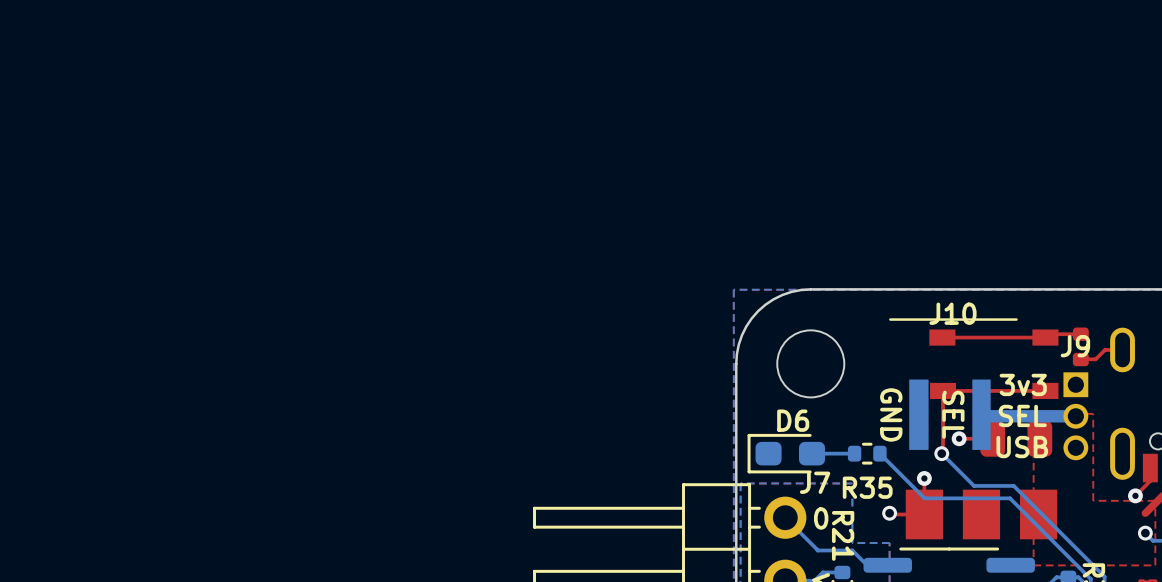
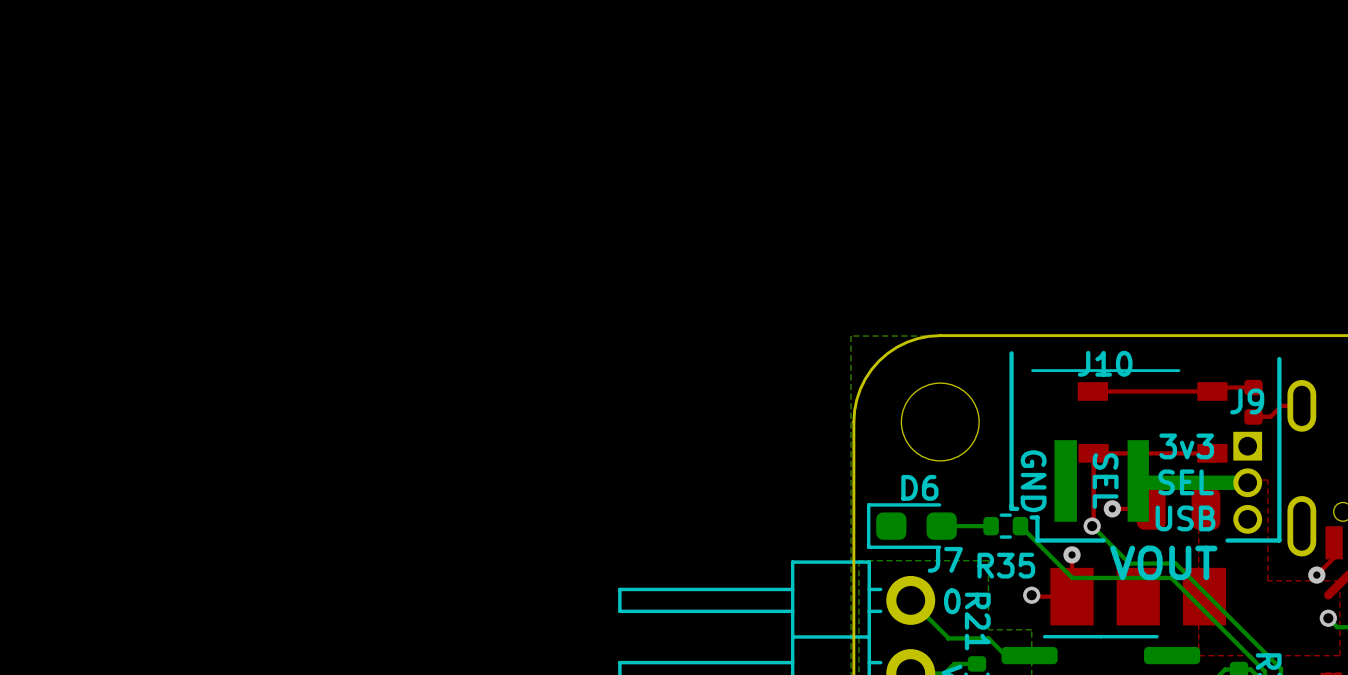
line: none -> (1011, 353) (1011, 508) (1017, 508)
line: none -> (1279, 359) (1279, 540) (1227, 540)
line: none -> (1031, 517) (1037, 517) (1037, 540) (1103, 540)
text: none -> VOUT (1163, 562)

